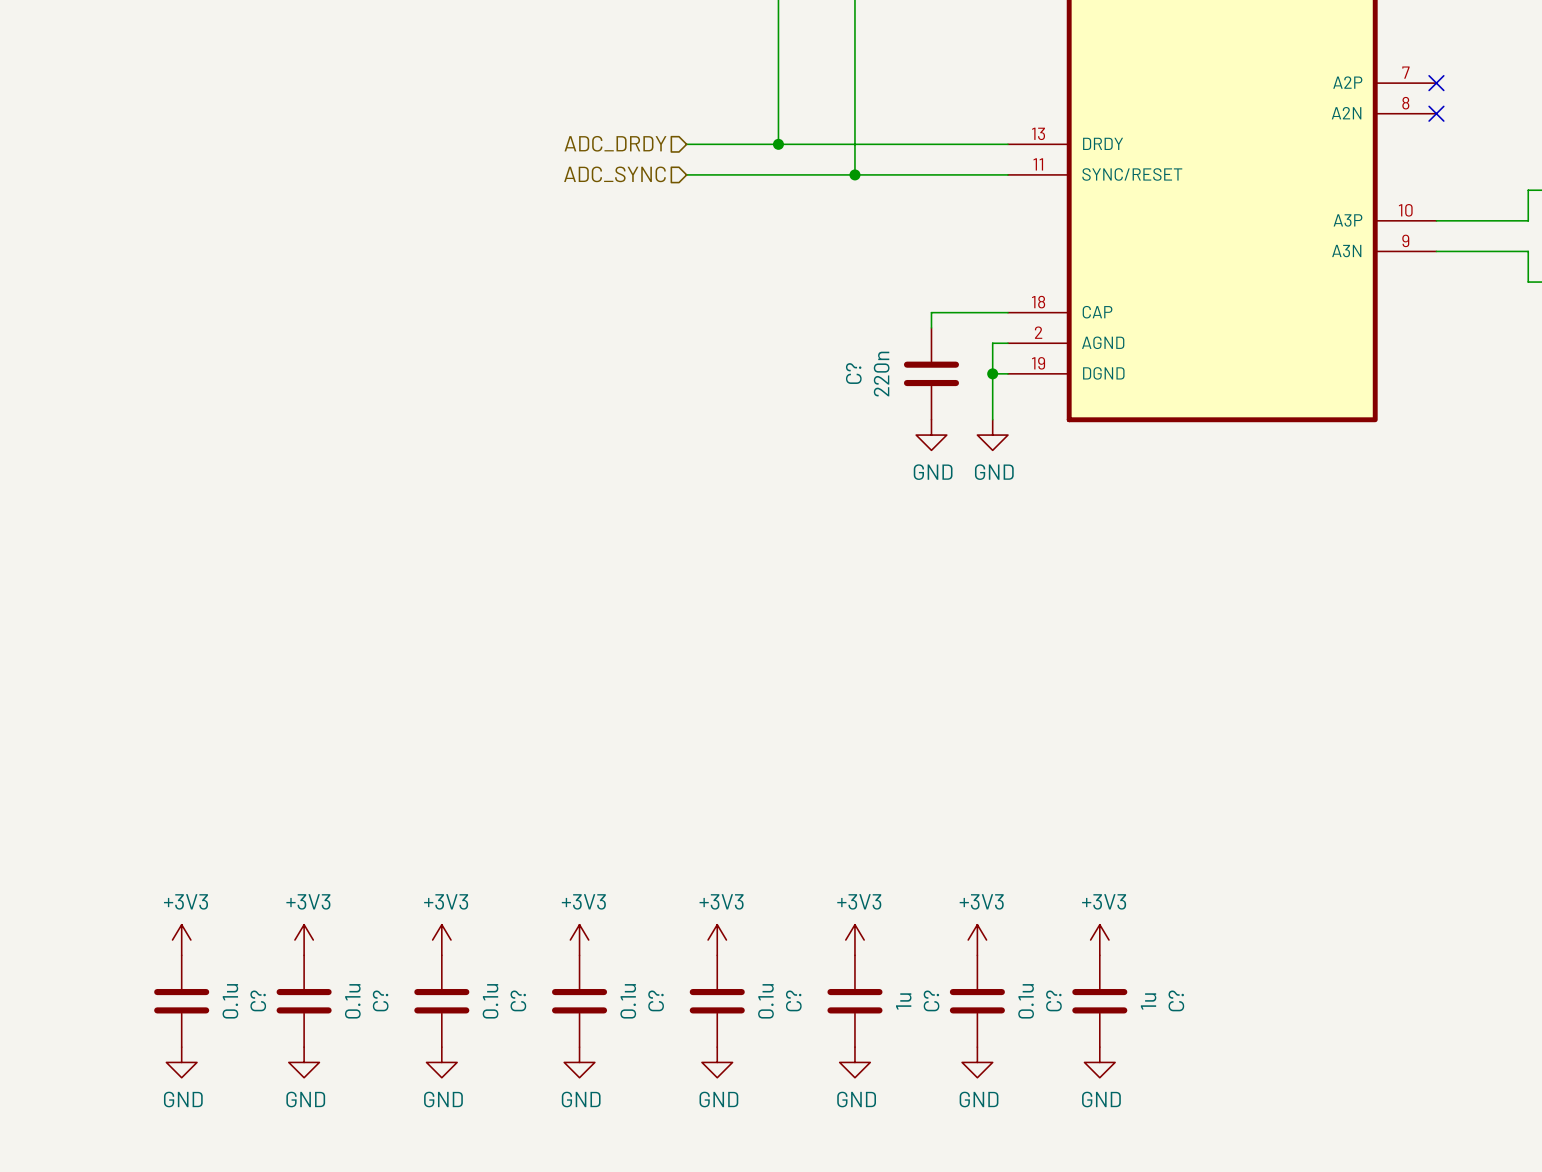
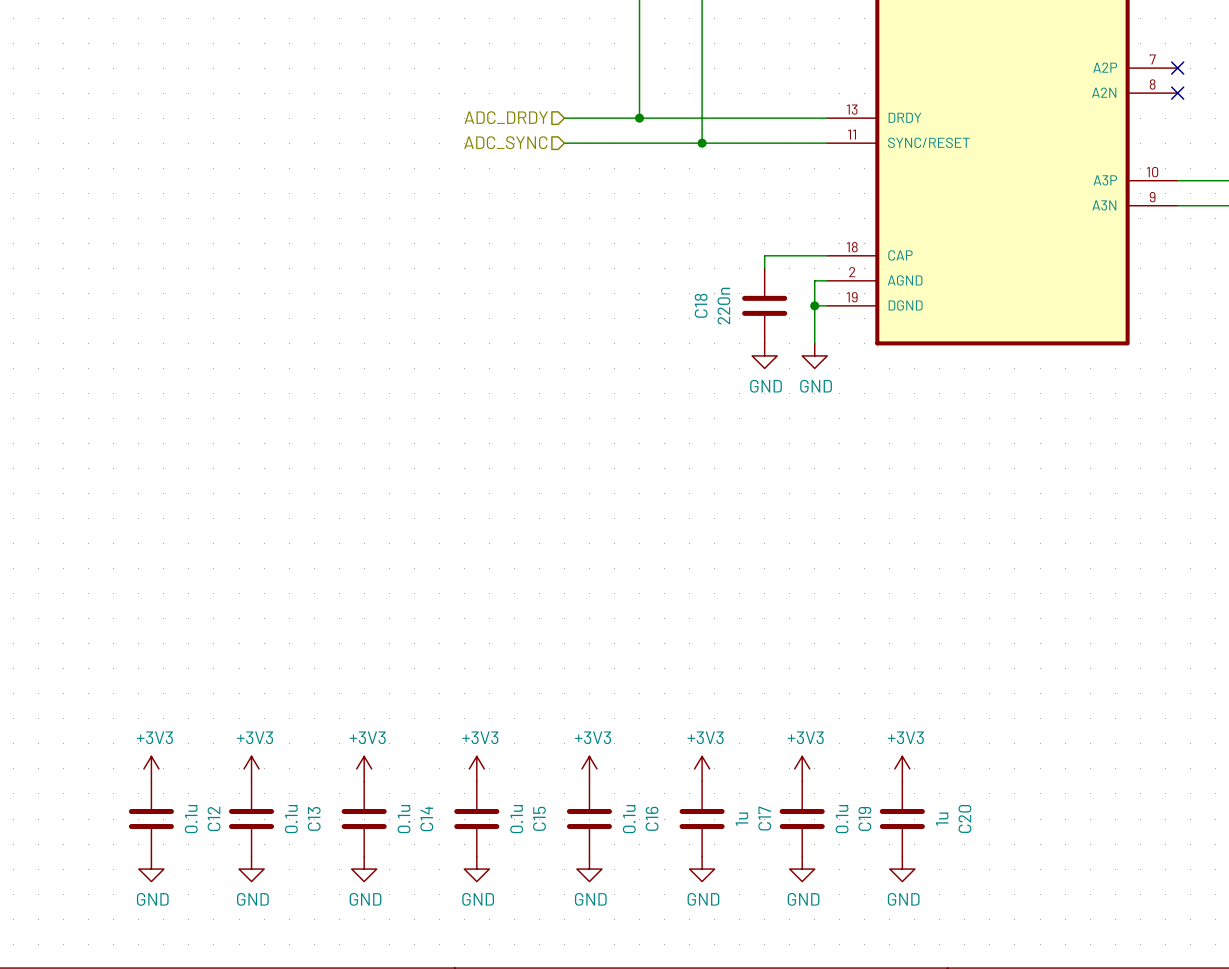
C? name: C? (853, 373) -> C18 (701, 305)
C? name: C? (258, 1000) -> C12 (214, 818)
C? name: C? (380, 1000) -> C13 (314, 818)
C? name: C? (518, 1000) -> C14 (426, 818)
C? name: C? (656, 1000) -> C15 (539, 818)
C? name: C? (793, 1000) -> C16 (652, 818)
C? name: C? (931, 1000) -> C17 (764, 818)
C? name: C? (1053, 1000) -> C19 (864, 818)
C? name: C? (1176, 1000) -> C20 (964, 818)

